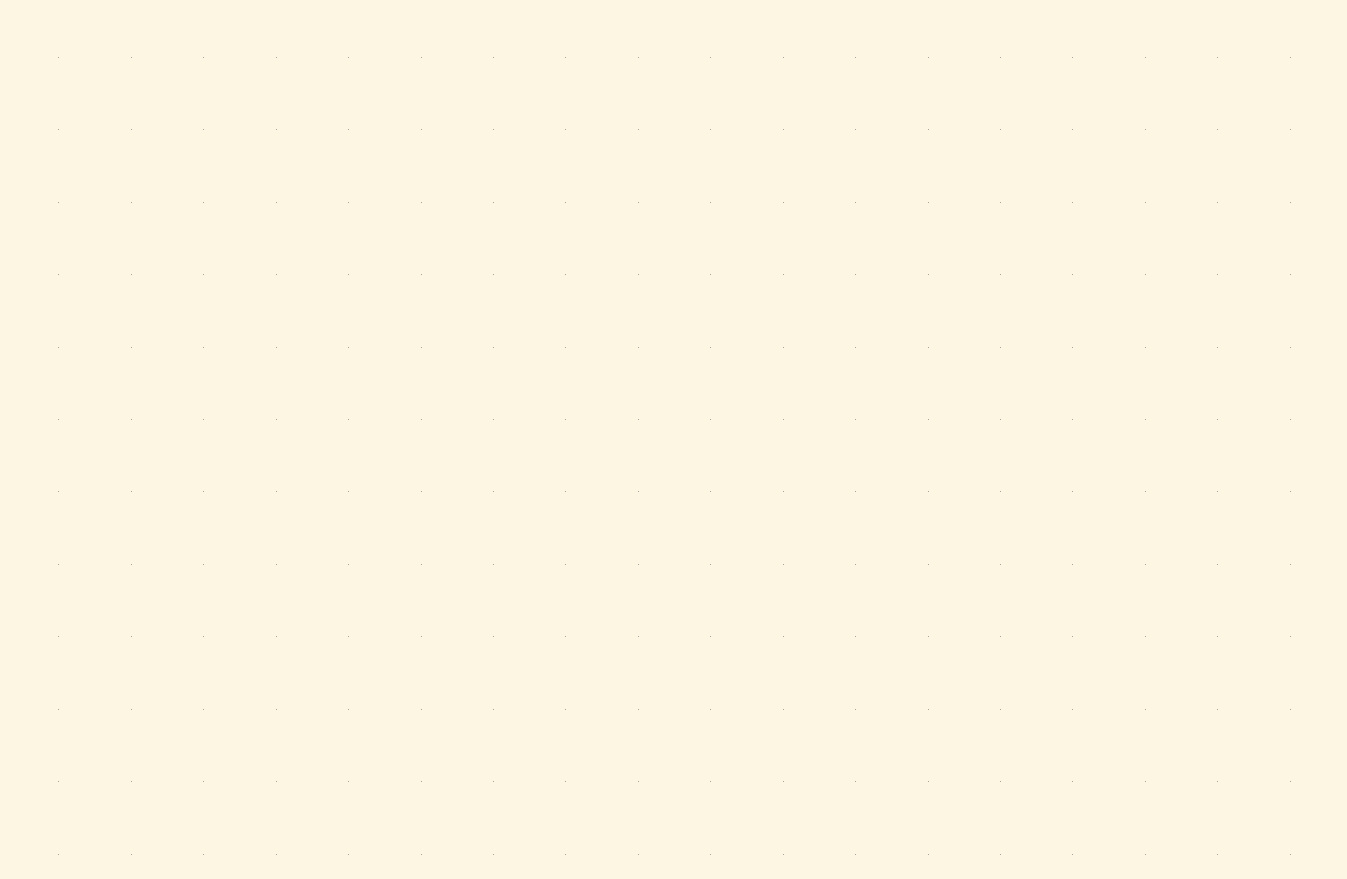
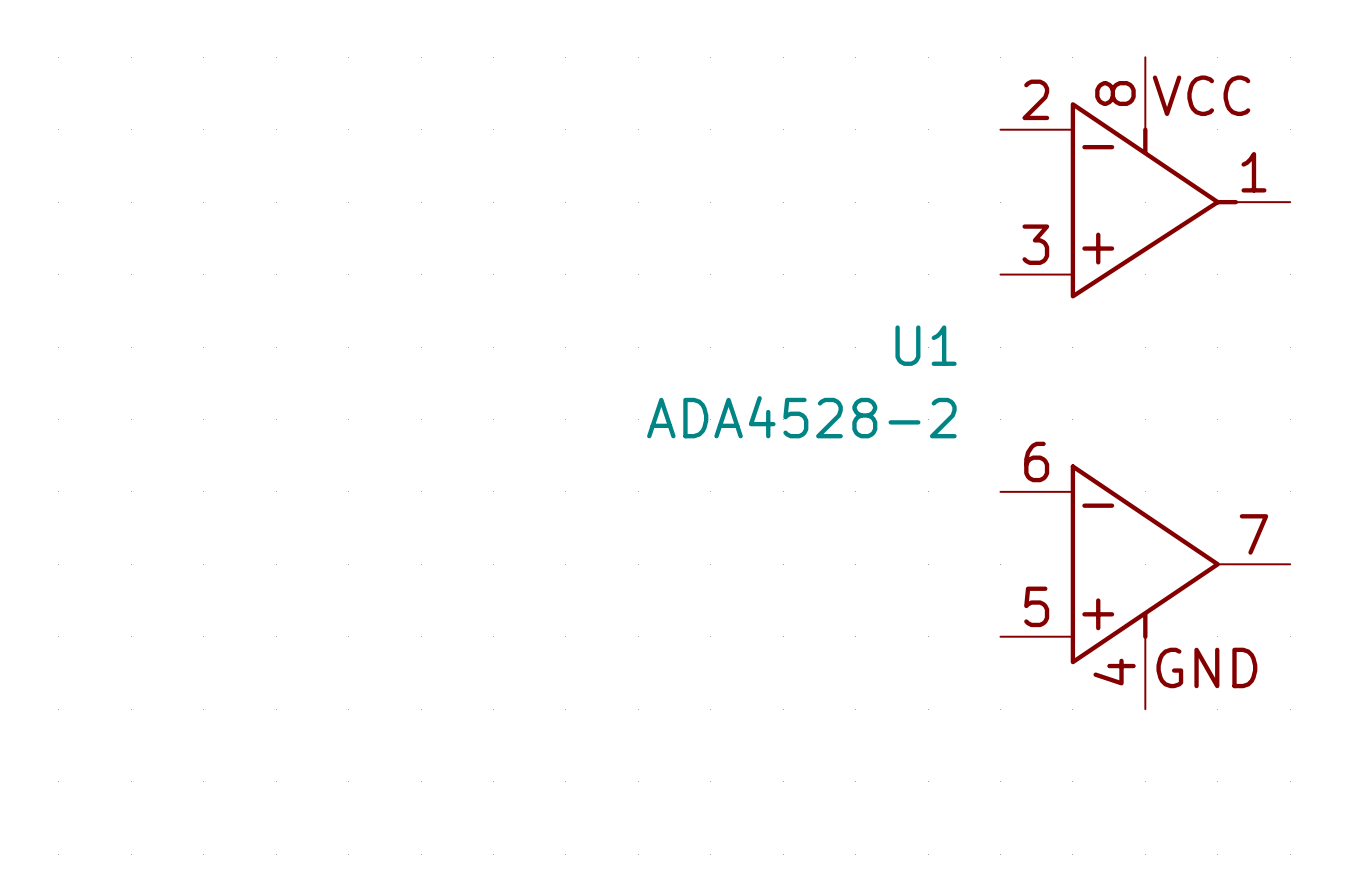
U1: none -> ADA4528-2 (1145, 383)

